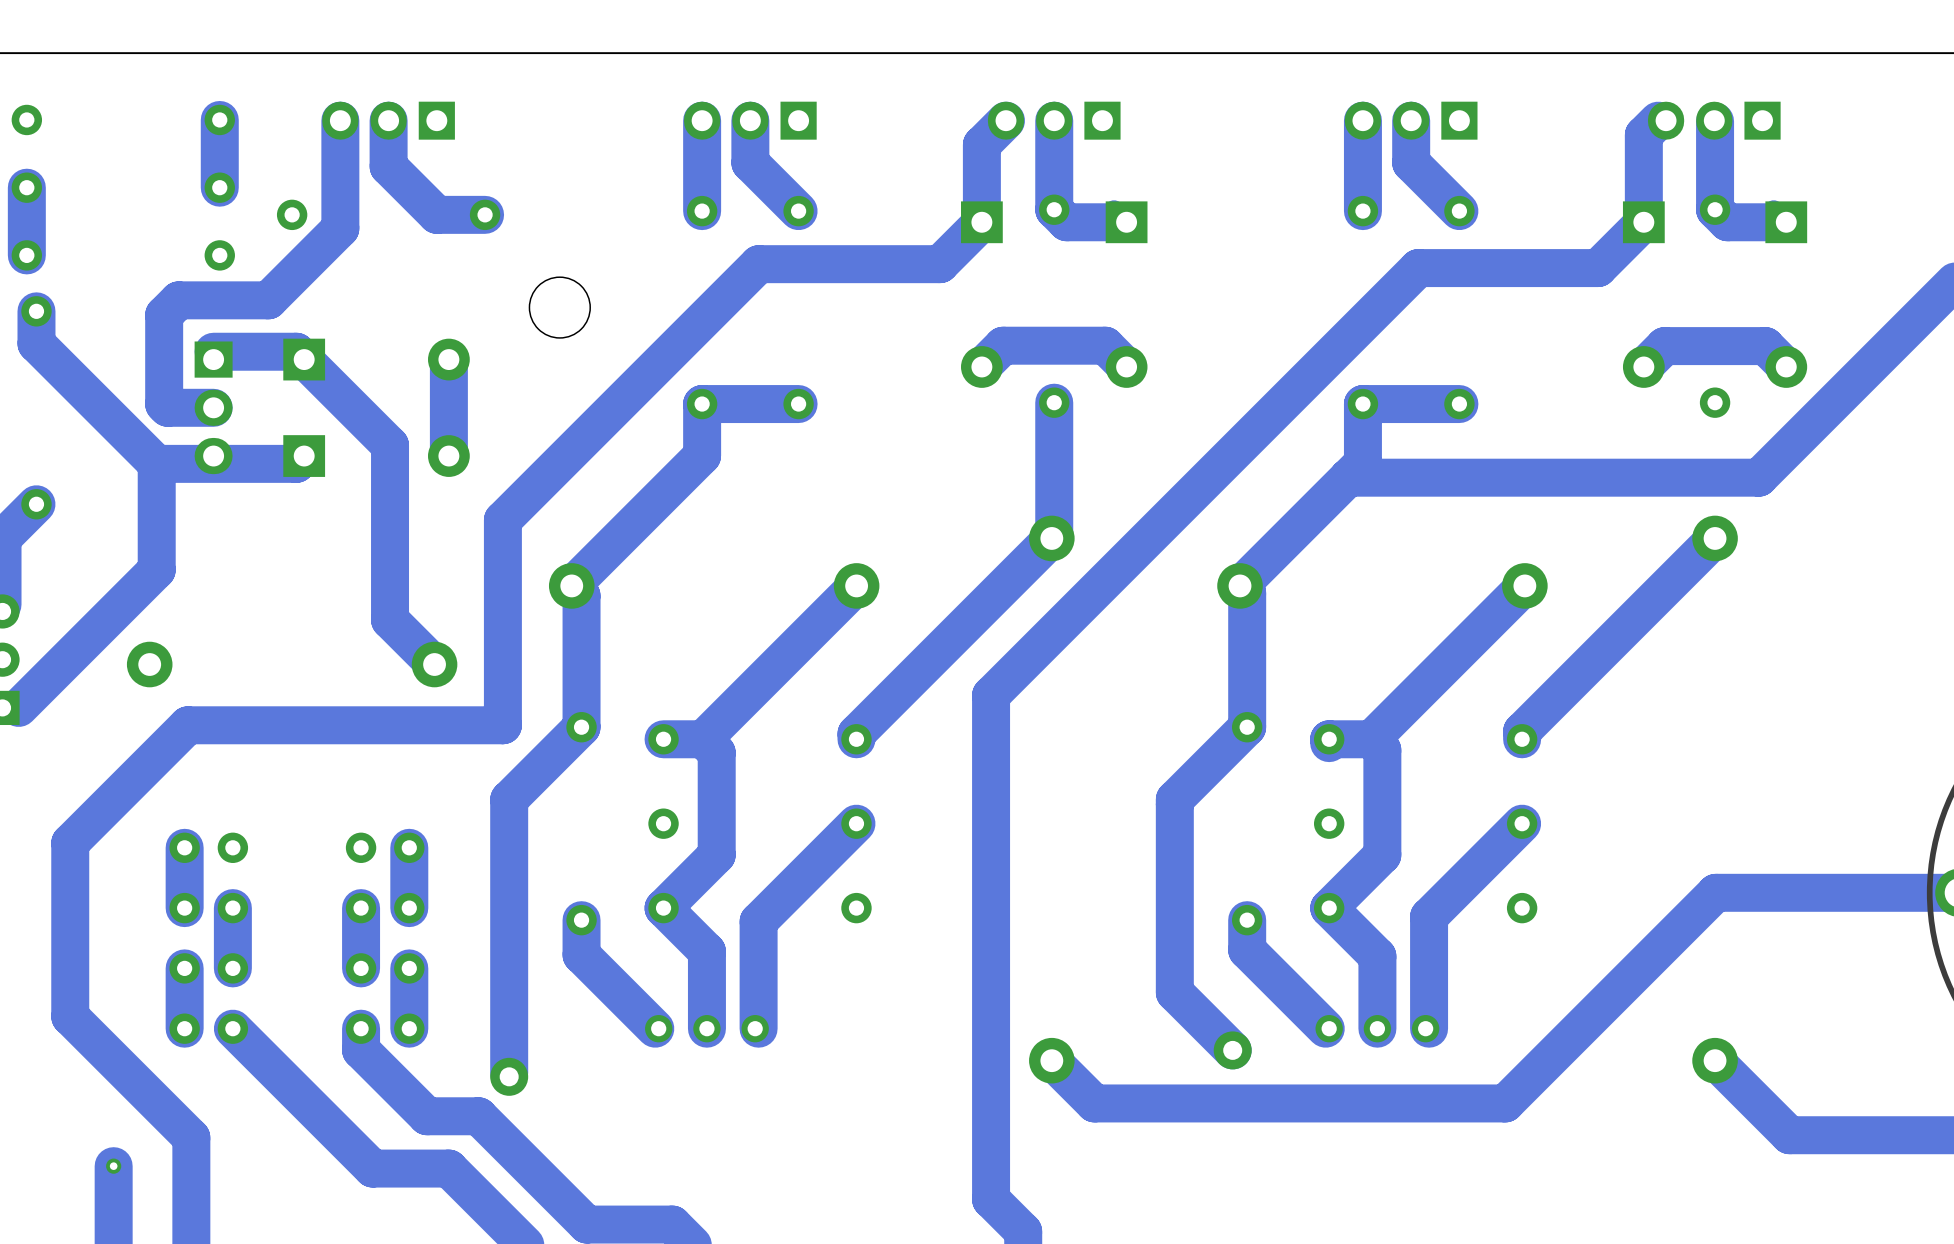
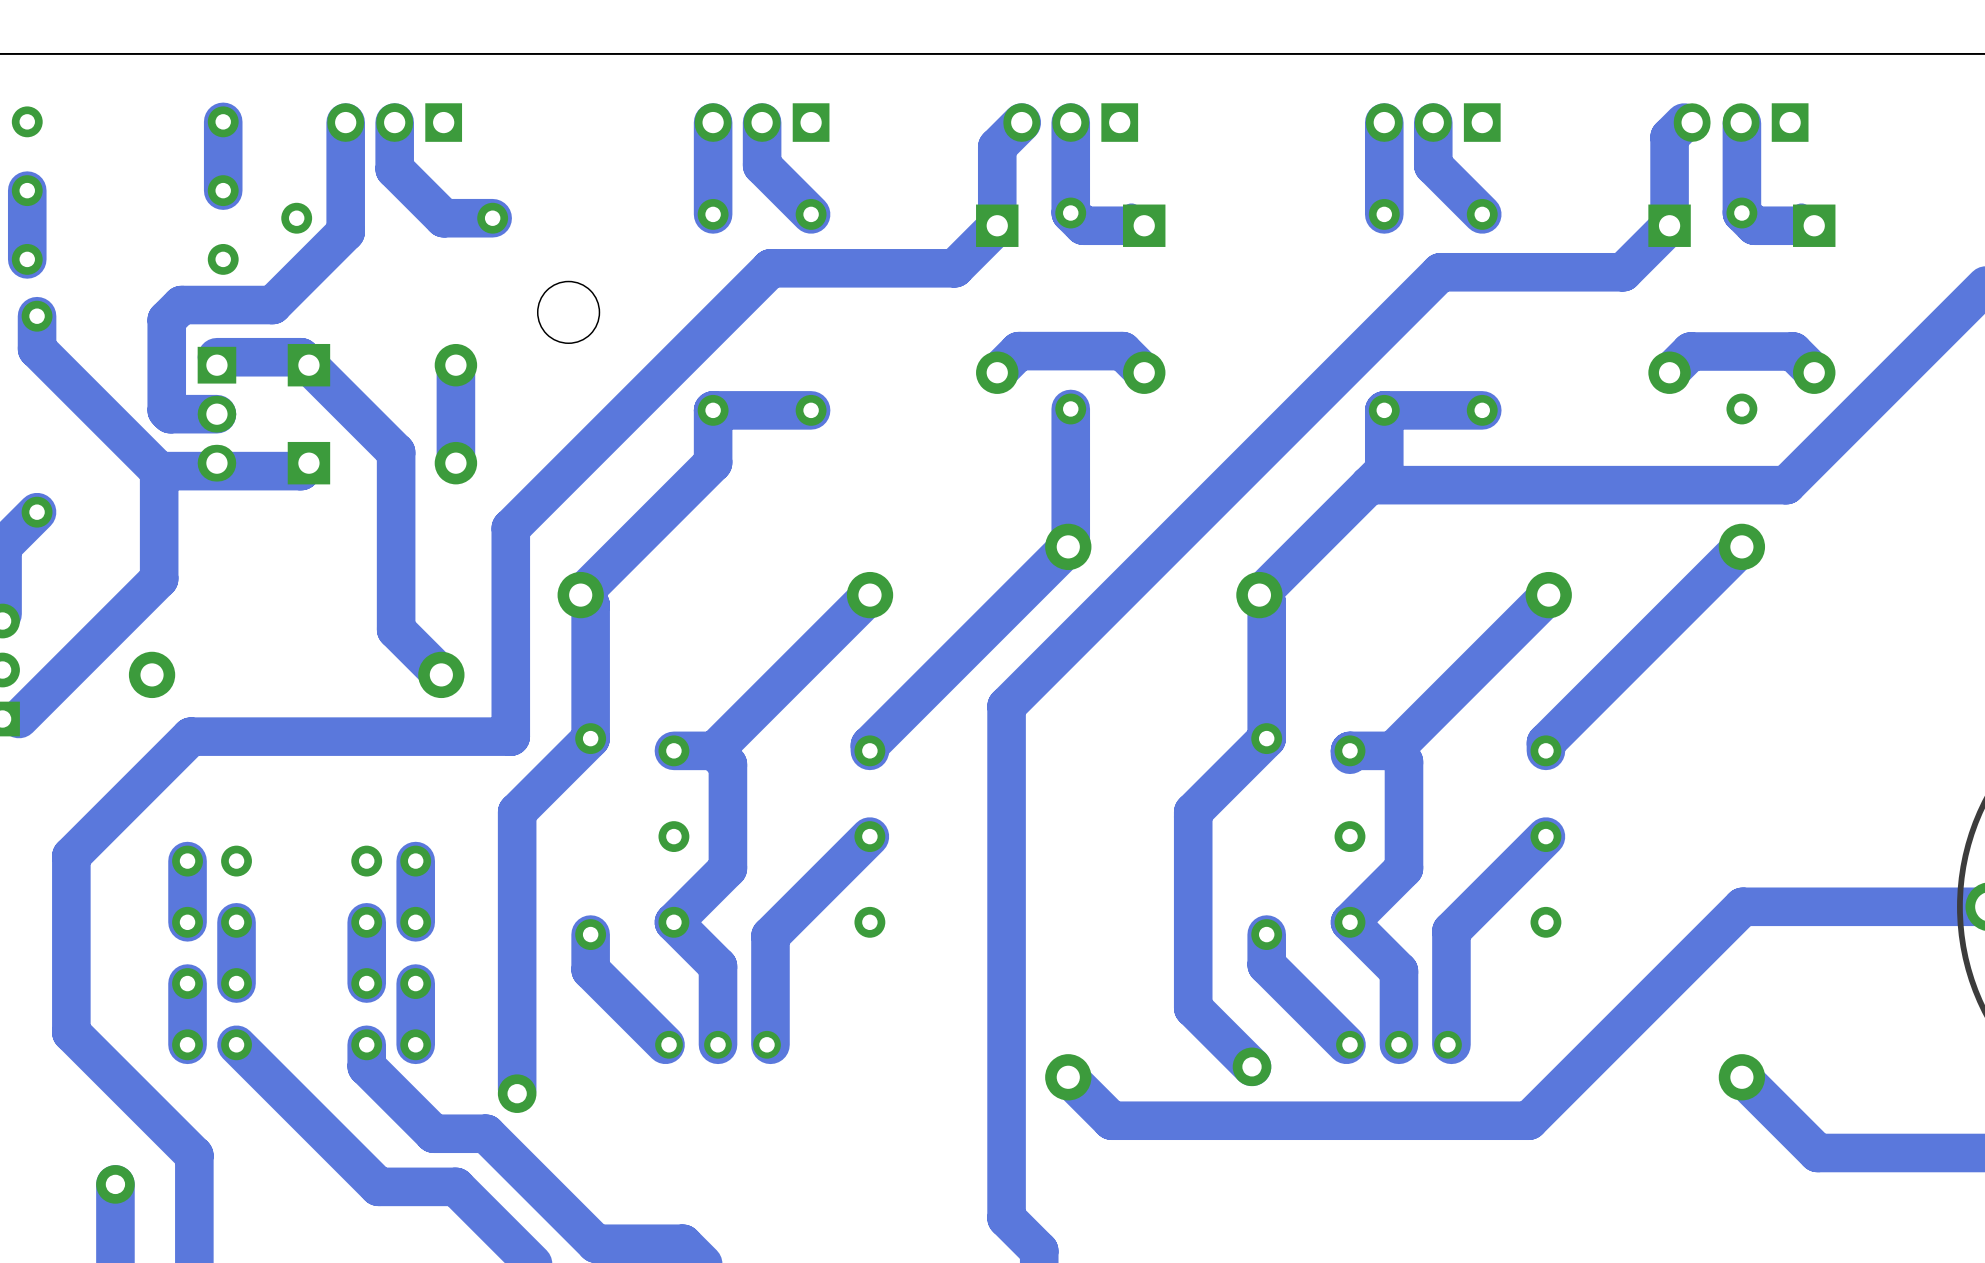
via size: [106, 1158, 122, 1174] -> [96, 1165, 135, 1204]

